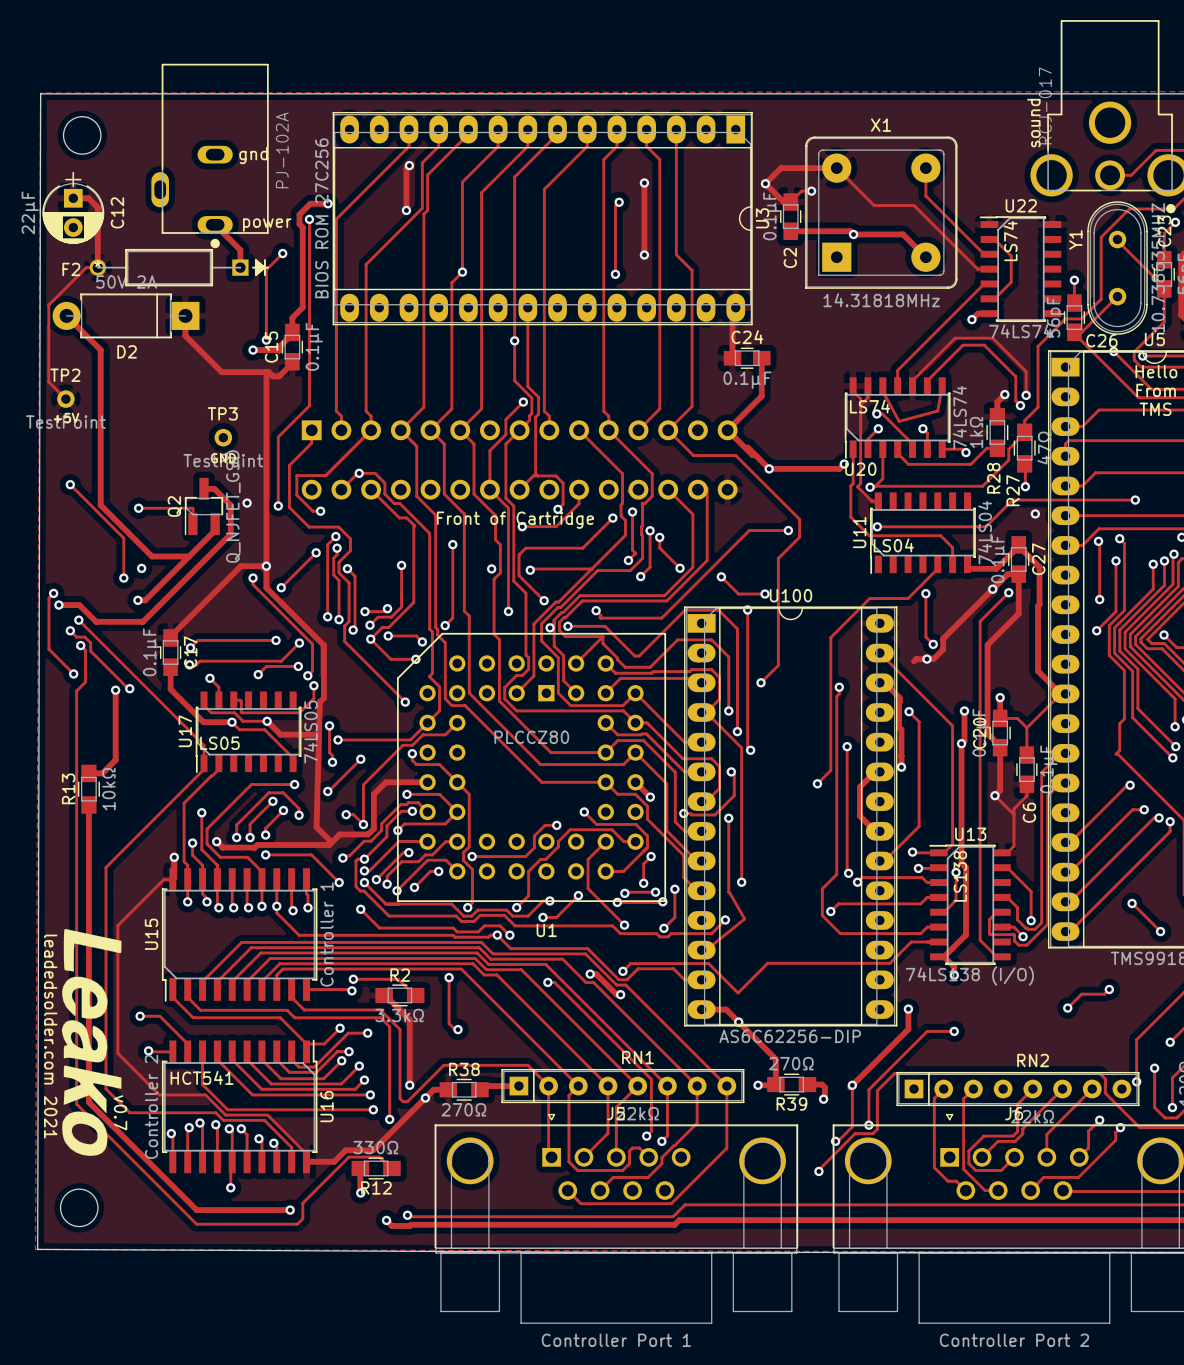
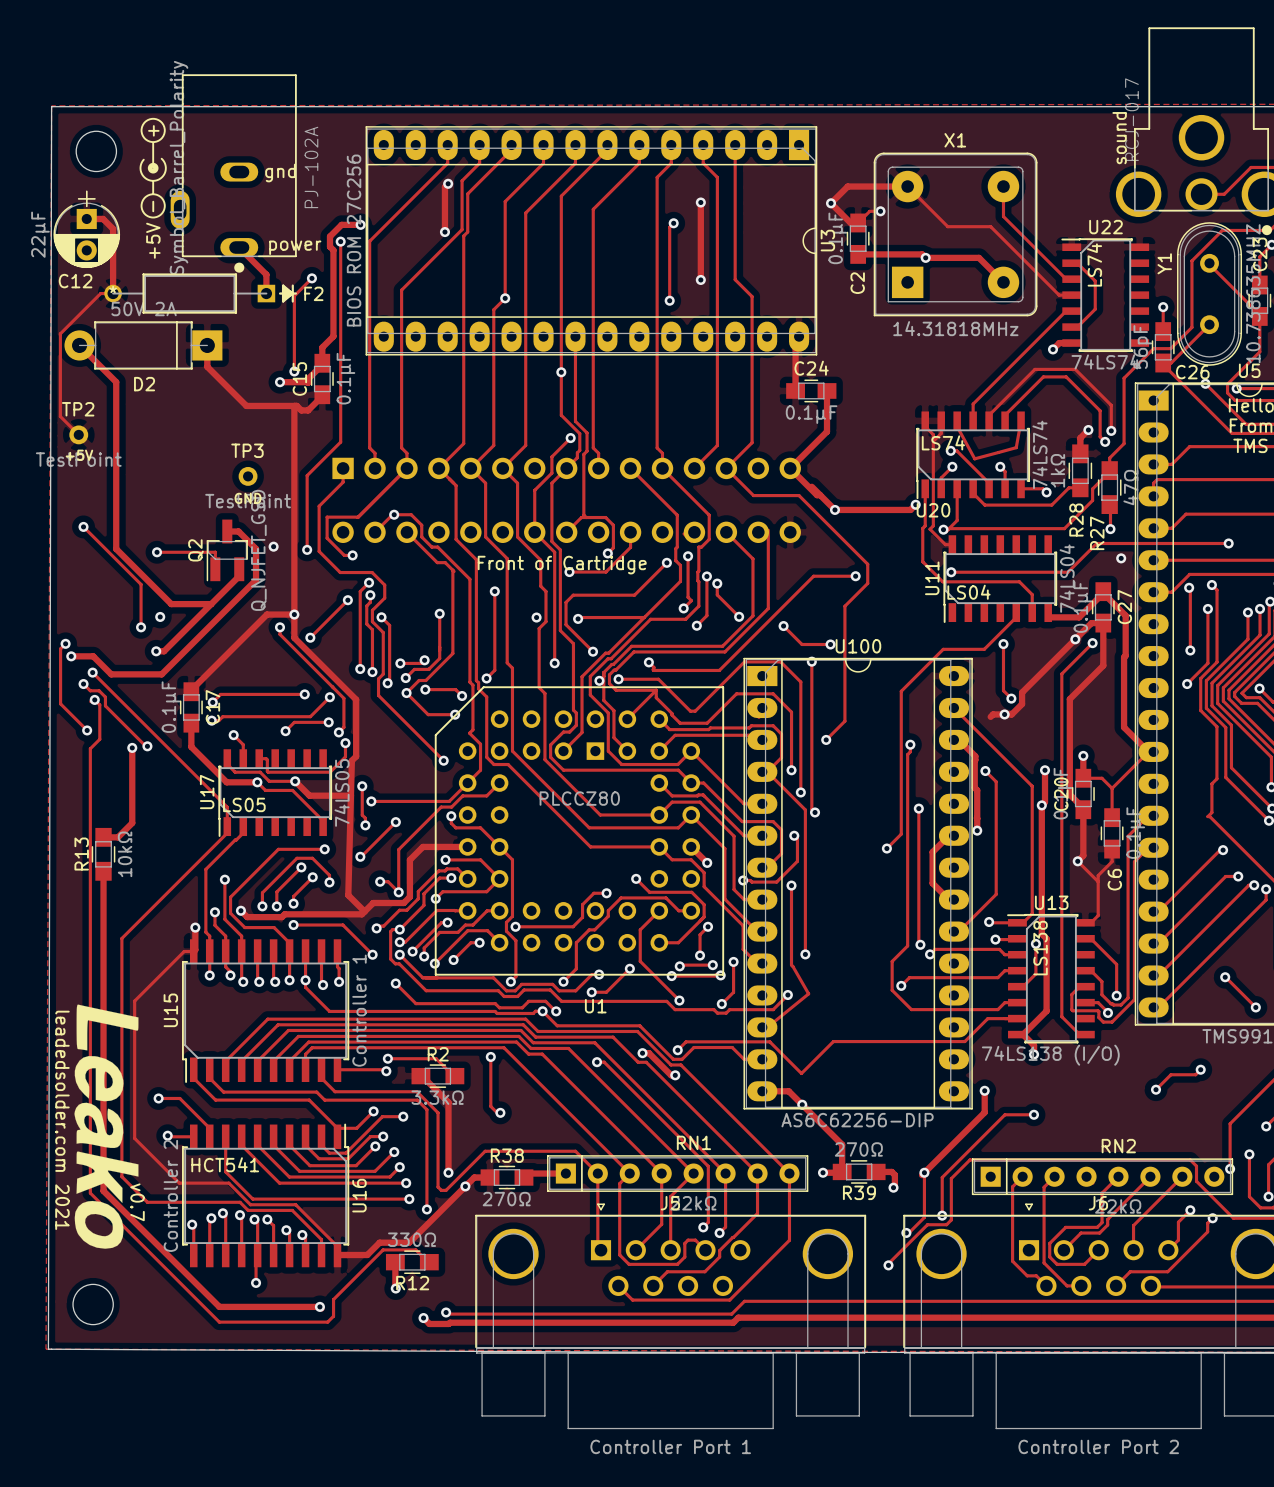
drawing: none -> [139, 117, 167, 219]
text: none -> + (153, 130)
text: none -> - (153, 206)
C12 name rotation: 0° (117, 212) -> 90° clockwise (75, 281)
C12 name position: C12 (117, 212) -> C12 (75, 281)
text: none -> +5V (153, 240)
F2 name position: F2 (71, 269) -> F2 (313, 293)

